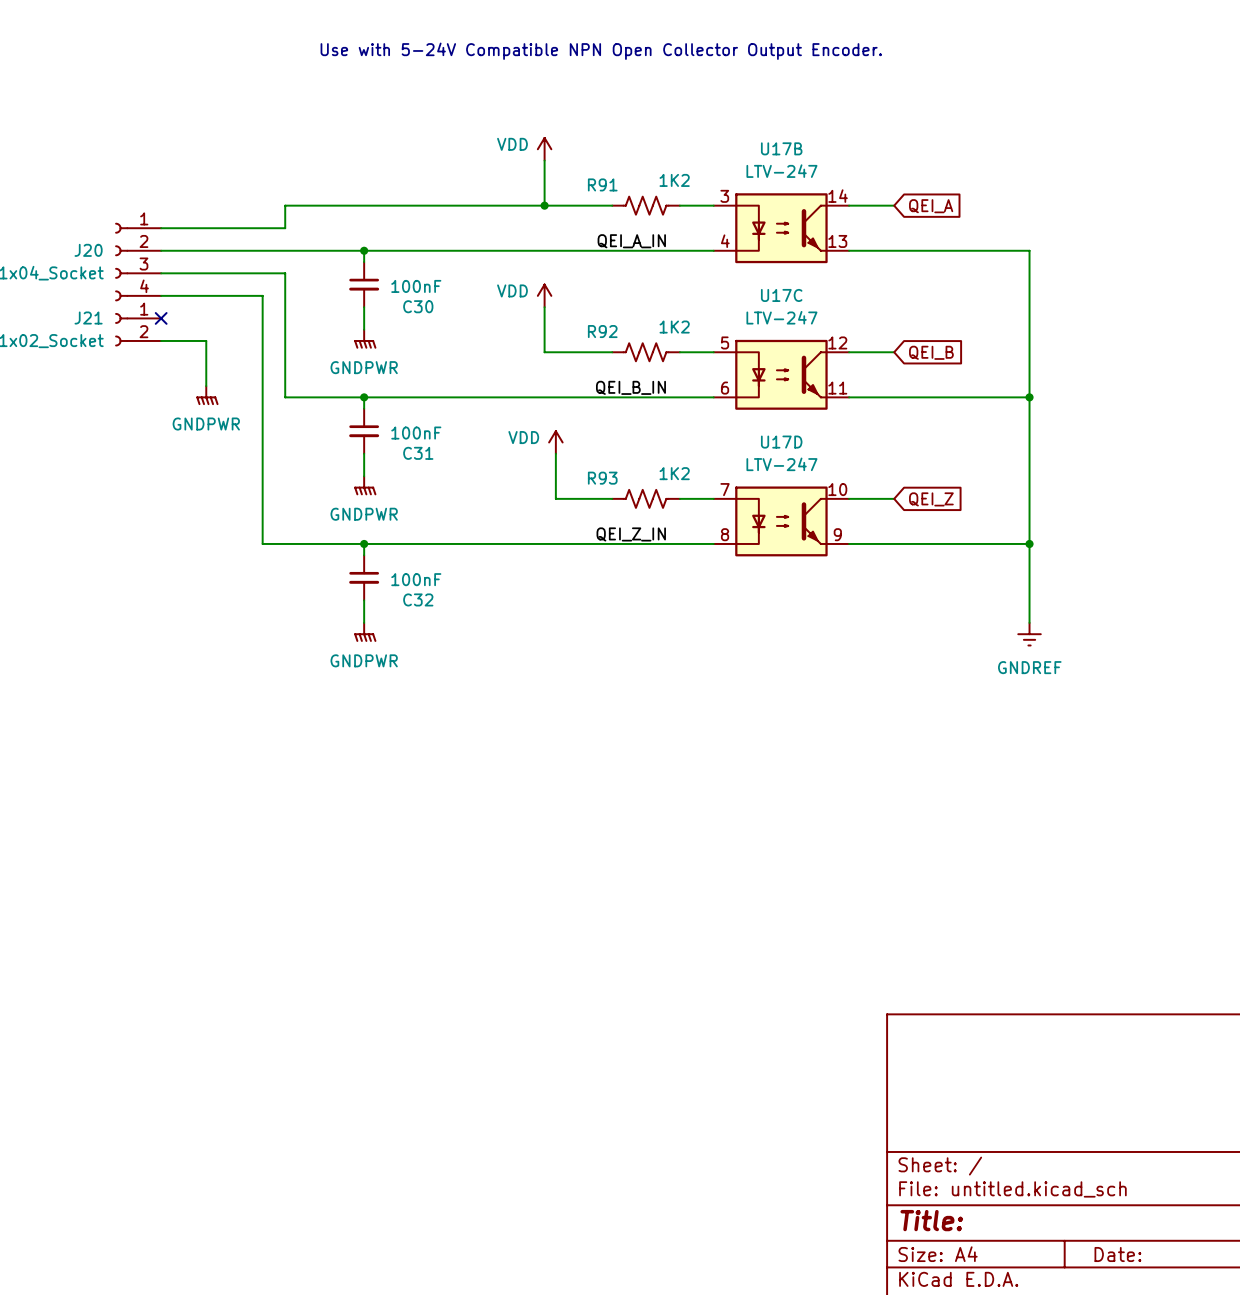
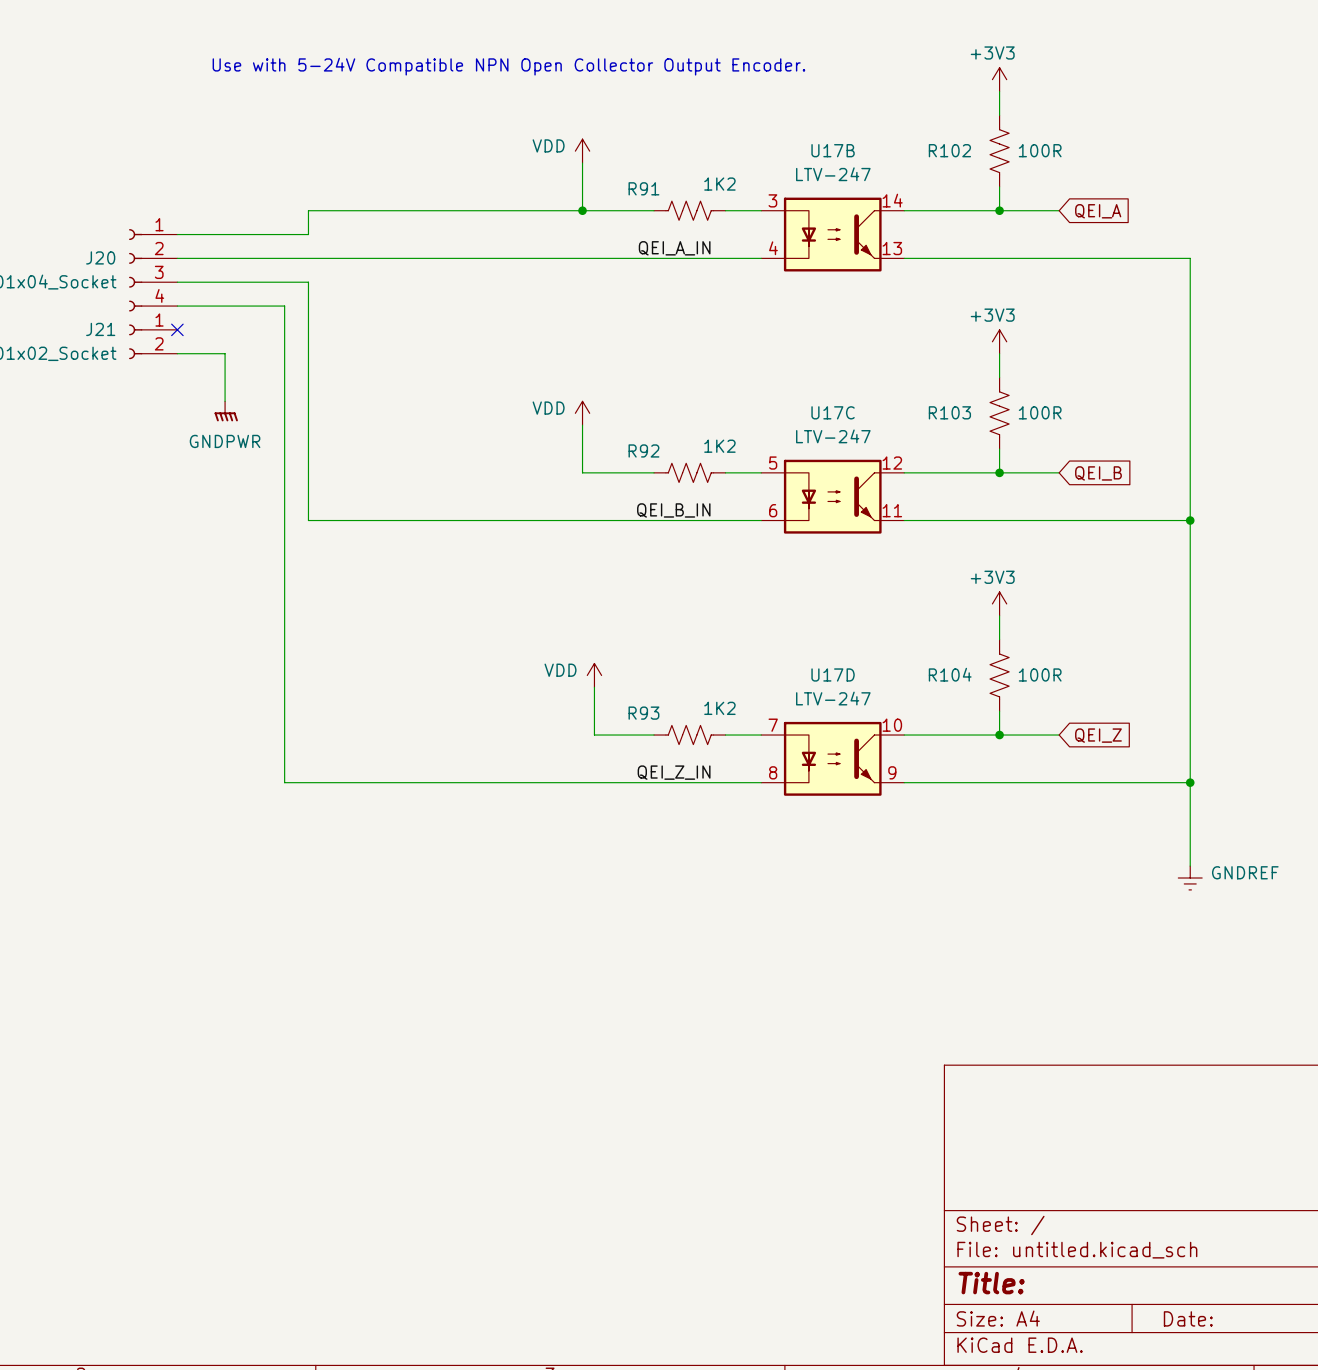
text position: Use with 5-24V Compatible NPN Open Collector Output Encoder. (601, 51) -> Use with 5-24V Compatible NPN Open Collector Output Encoder. (508, 66)
power symbol: none -> +3V3 (999, 79)
wire: none -> (999, 91) (999, 115)
R102: none -> 100R (999, 151)
wire: none -> (999, 186) (999, 210)
wire: none -> (951, 210) (1059, 210)
junction: none -> (999, 210)
global label position: QEI_A (931, 206) -> QEI_A (1098, 211)
wire: (364, 250) (364, 262) -> none
junction: (364, 250) -> none
wire: (1029, 250) (1029, 622) -> (1094, 258) (1190, 258) (1190, 866)
C30: 100nF (364, 284) -> none
power symbol: VDD (544, 295) -> none
wire: (364, 307) (364, 329) -> none
wire: (544, 307) (544, 352) (612, 352) -> (582, 425) (582, 472) (654, 472)
power symbol: none -> +3V3 (999, 341)
power symbol: GNDPWR (365, 339) -> none
wire: none -> (999, 353) (999, 377)
R92 position: (646, 352) -> (689, 472)
wire: (679, 352) (713, 352) -> (725, 472) (761, 472)
wire: (849, 352) (894, 352) -> none
global label position: QEI_B (931, 352) -> QEI_B (1098, 473)
U17C position: (781, 374) -> (832, 496)
label position: QEI_B_IN (630, 387) -> QEI_B_IN (673, 510)
wire: (285, 397) (713, 397) -> (308, 413) (308, 520) (594, 520)
wire: (364, 397) (364, 408) -> none
junction: (364, 397) -> none
wire: (849, 397) (1029, 397) -> none
R103: none -> 100R (999, 413)
junction: (1029, 397) -> none
C31: 100nF (364, 431) -> none
wire: none -> (999, 449) (999, 472)
power symbol position: VDD (555, 442) -> VDD (582, 413)
wire: (364, 453) (364, 476) -> none
wire: (555, 453) (555, 498) -> none
wire: none -> (904, 472) (1059, 472)
junction: none -> (999, 472)
power symbol: GNDPWR (365, 485) -> none
R93 position: (646, 498) -> (689, 735)
wire: none -> (951, 520) (1190, 520)
junction: none -> (1190, 520)
global label: QEI_Z (931, 499) -> none
U17D position: (781, 521) -> (832, 758)
label position: QEI_Z_IN (631, 534) -> QEI_Z_IN (674, 772)
wire: (262, 543) (713, 543) -> (284, 568) (284, 782) (761, 782)
wire: (364, 543) (364, 555) -> none
junction: (364, 543) -> none
wire: (849, 543) (1029, 543) -> none
junction: (1029, 543) -> none
C32: 100nF (364, 577) -> none
power symbol: none -> +3V3 (999, 603)
wire: none -> (999, 615) (999, 639)
wire: (364, 600) (364, 622) -> none
power symbol: GNDPWR (365, 632) -> none
power symbol: GNDREF (1029, 634) -> none
power symbol: none -> VDD (594, 675)
R104: none -> 100R (999, 675)
wire: none -> (594, 687) (594, 735) (654, 735)
wire: none -> (999, 711) (999, 735)
wire: none -> (725, 735) (761, 735)
wire: none -> (904, 735) (1059, 735)
junction: none -> (999, 735)
global label: none -> QEI_Z (1098, 735)
wire: none -> (904, 782) (1190, 782)
junction: none -> (1190, 782)
power symbol: none -> GNDREF (1190, 878)

